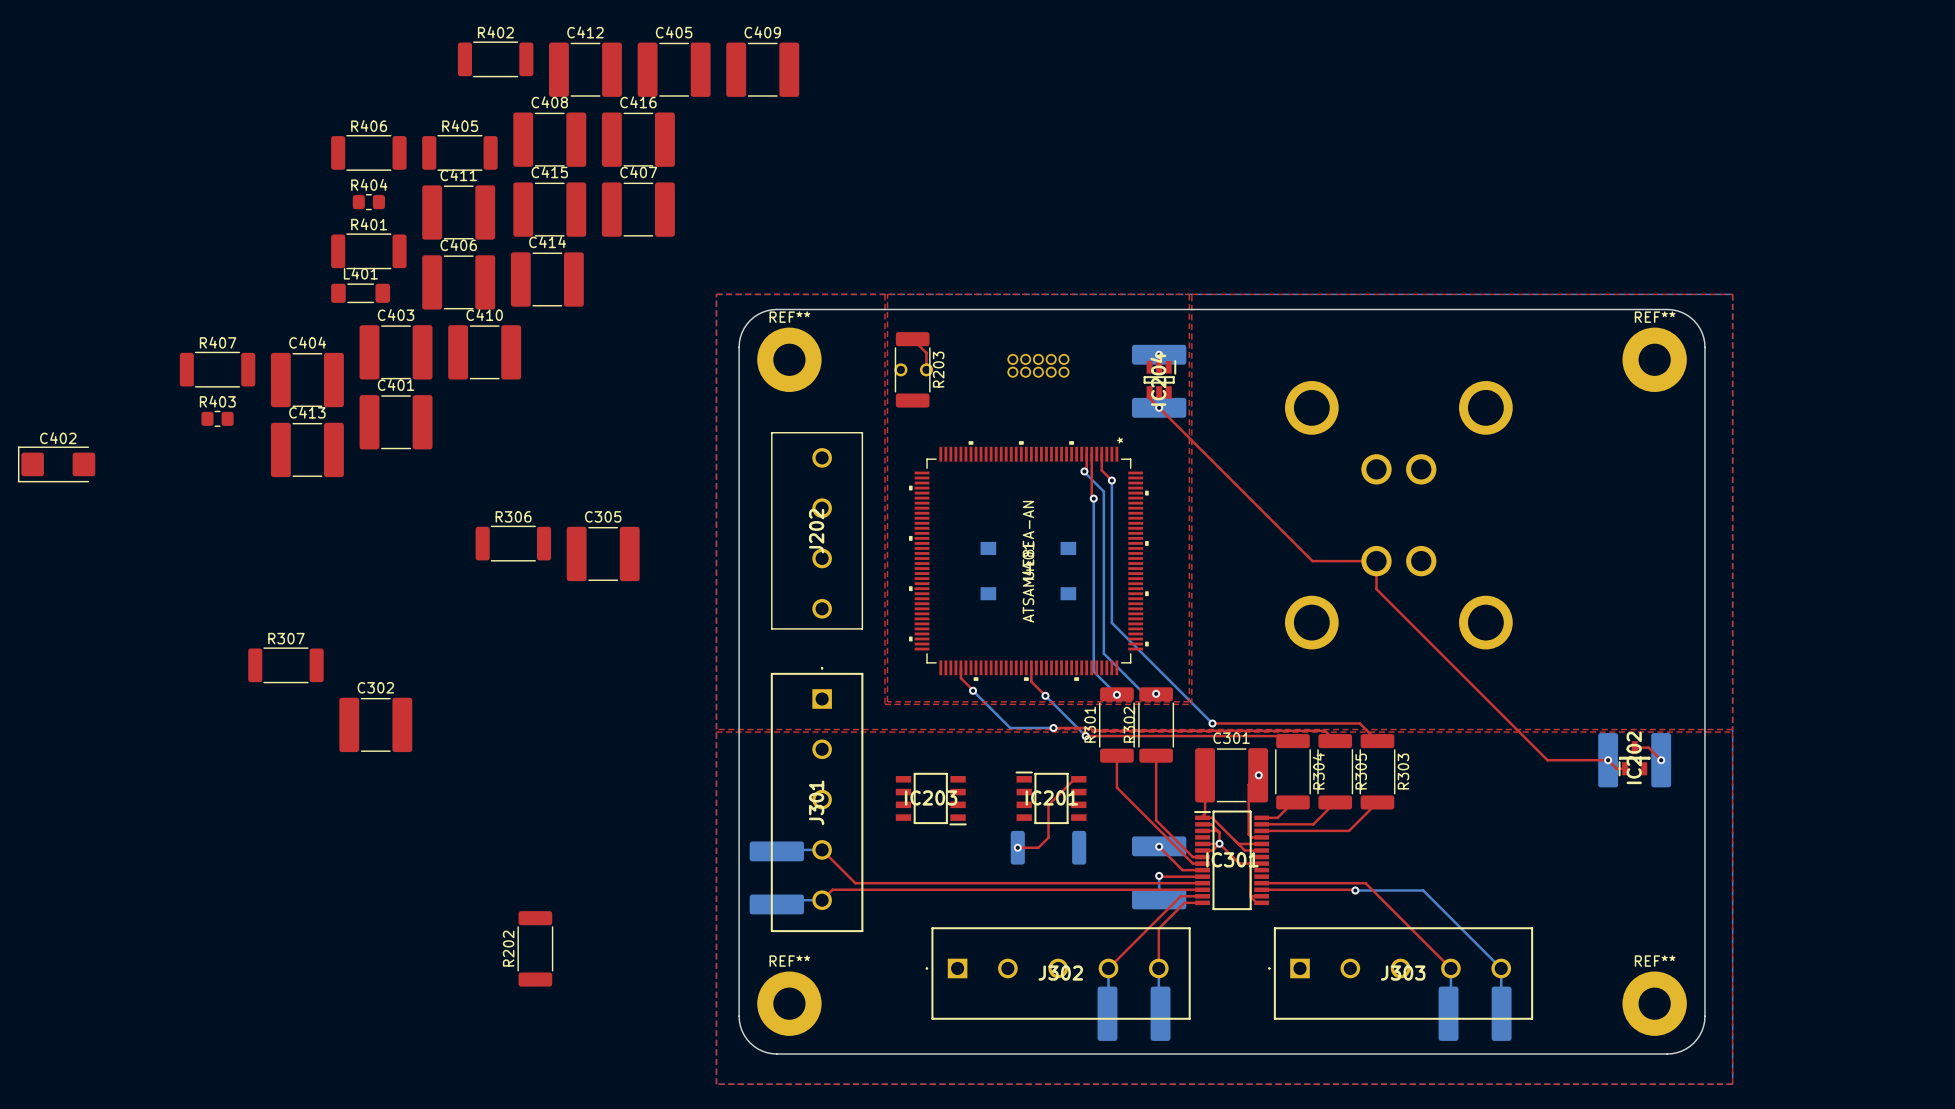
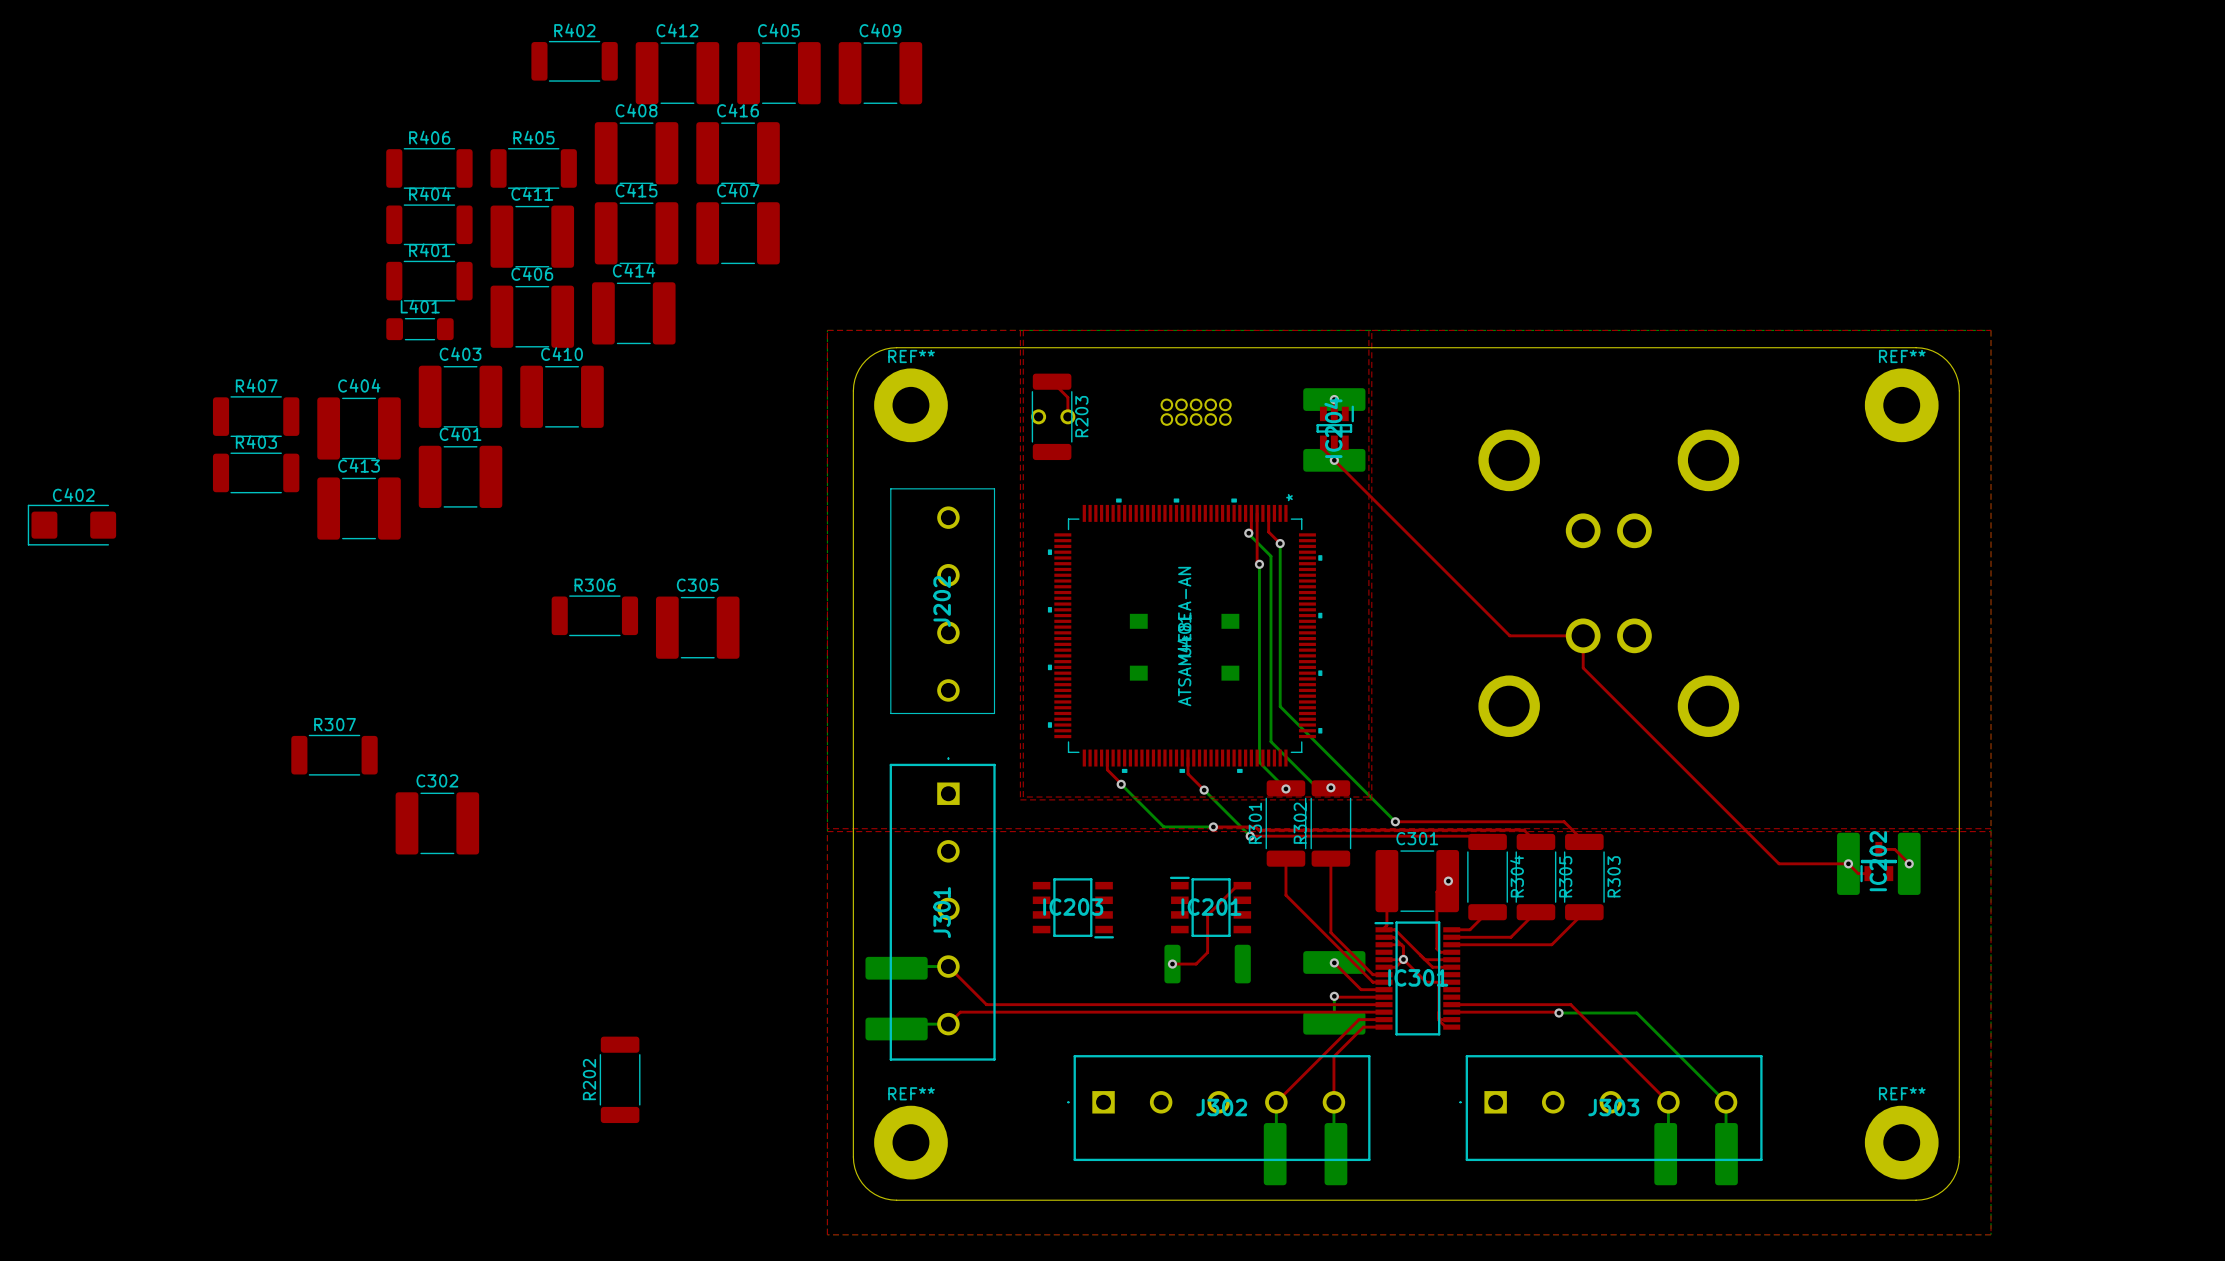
R404 footprint: [352, 194, 385, 211] -> [386, 204, 473, 246]
R403 footprint: [201, 410, 234, 427] -> [212, 452, 300, 494]

